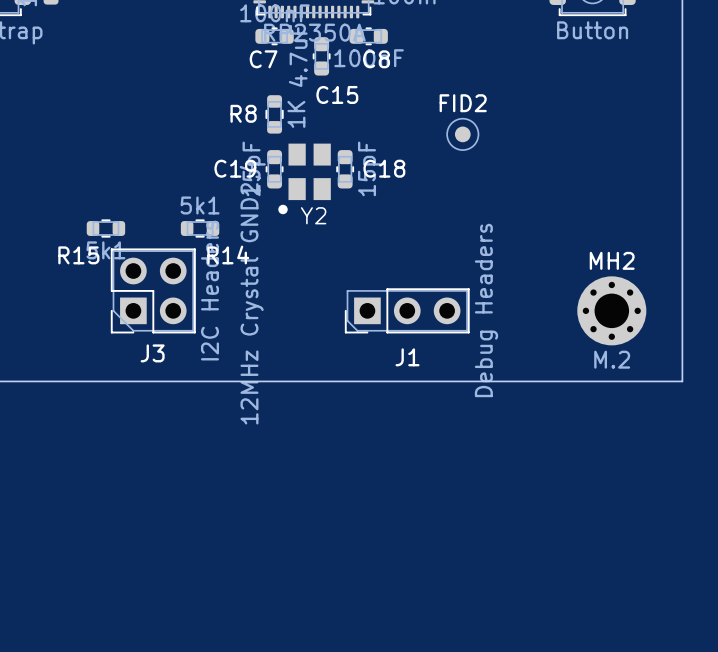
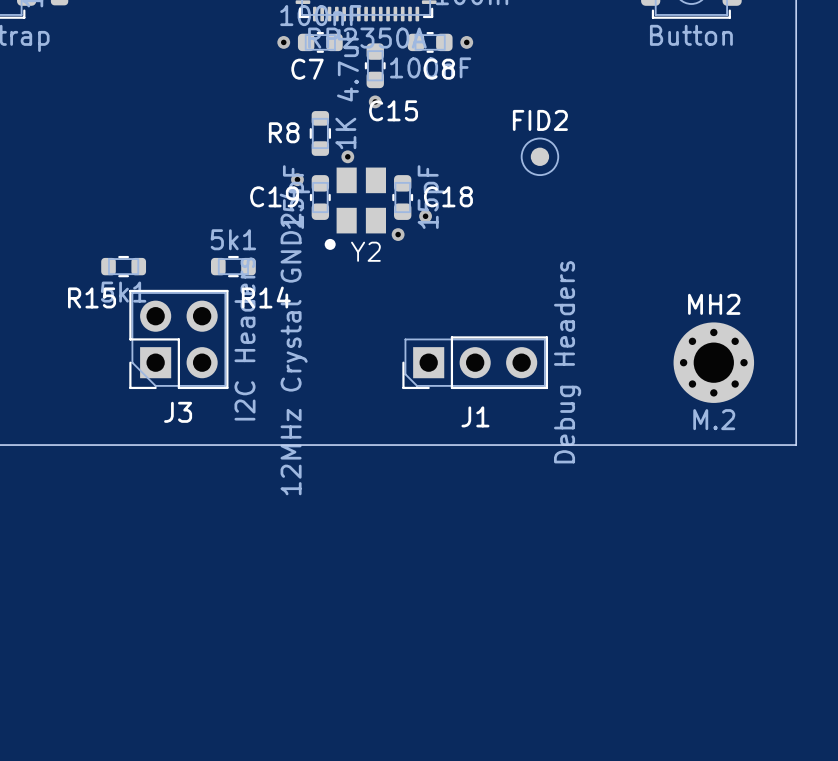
via: none -> (283, 42)
via: none -> (466, 42)
via: none -> (375, 101)
via: none -> (347, 156)
via: none -> (297, 179)
via: none -> (425, 216)
via: none -> (398, 234)

